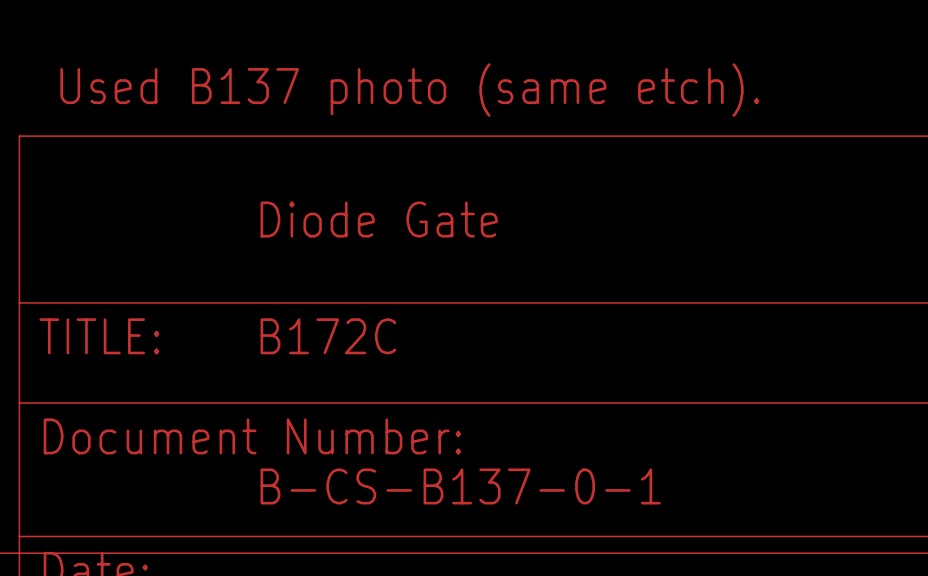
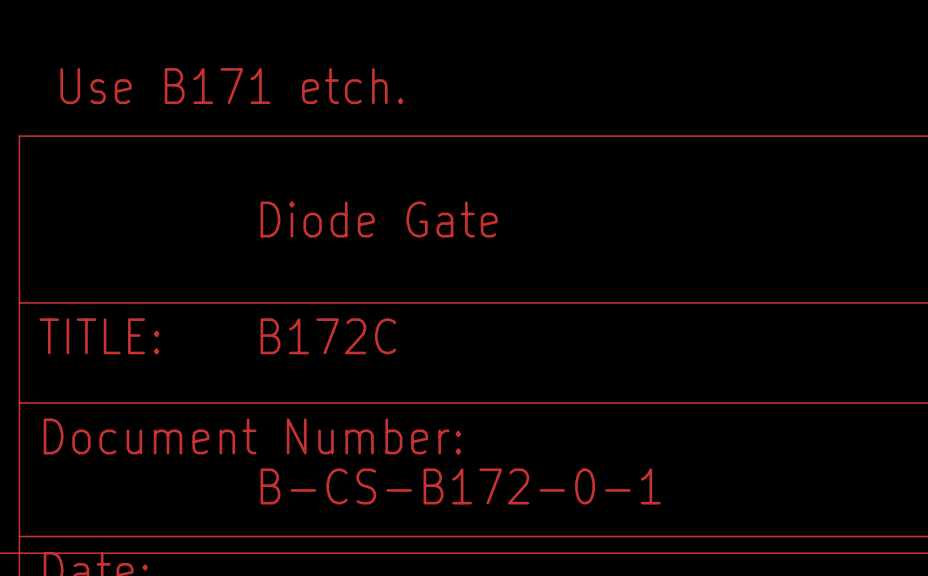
text: Used B137 photo (same etch). (409, 90) -> Use B171 etch. (231, 86)
text: B-CS-B137-0-1 (460, 486) -> B-CS-B172-0-1 (460, 486)

